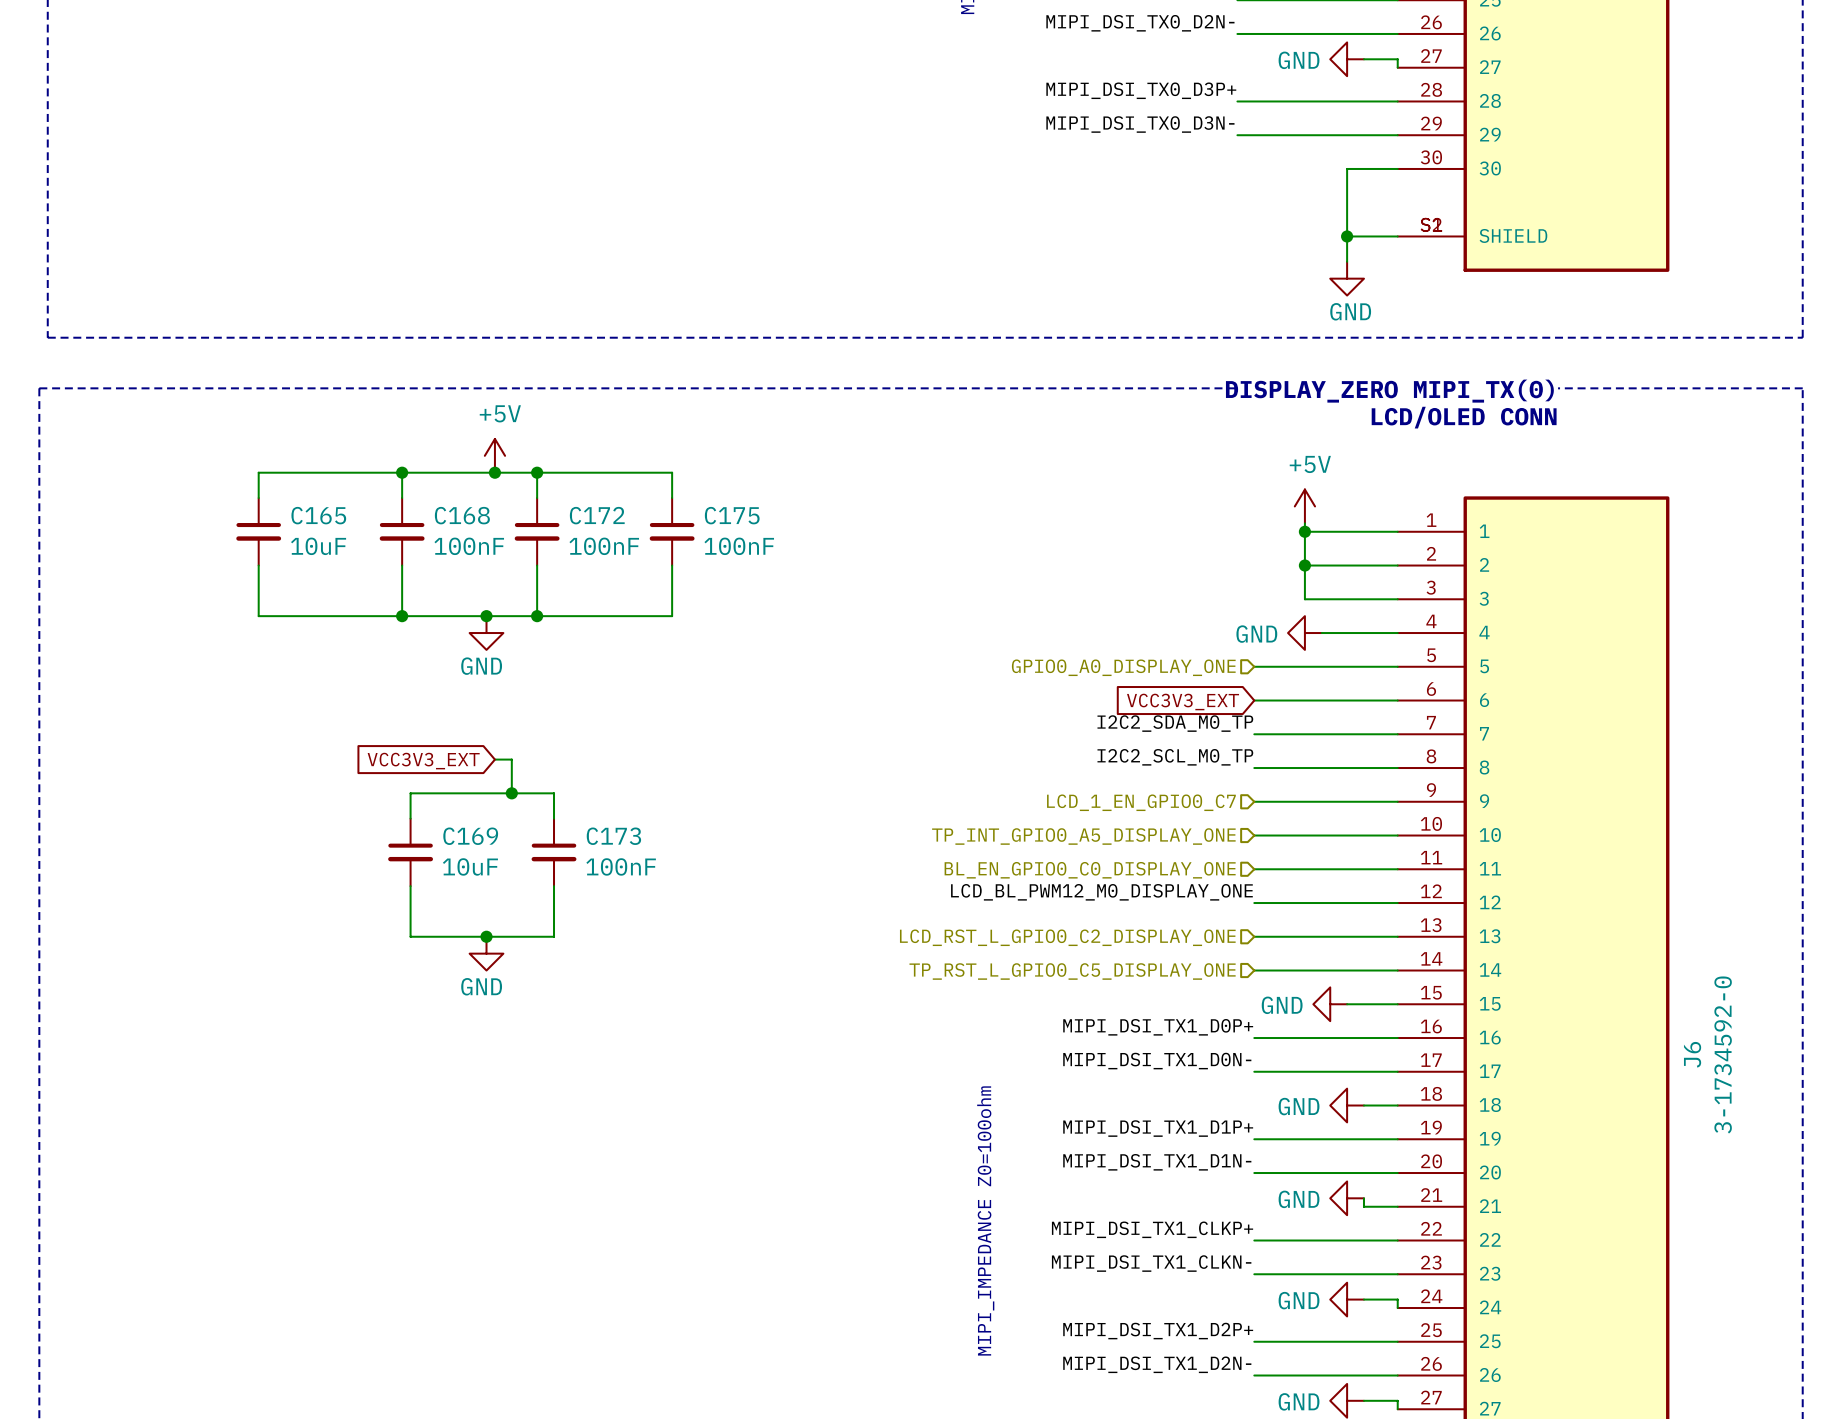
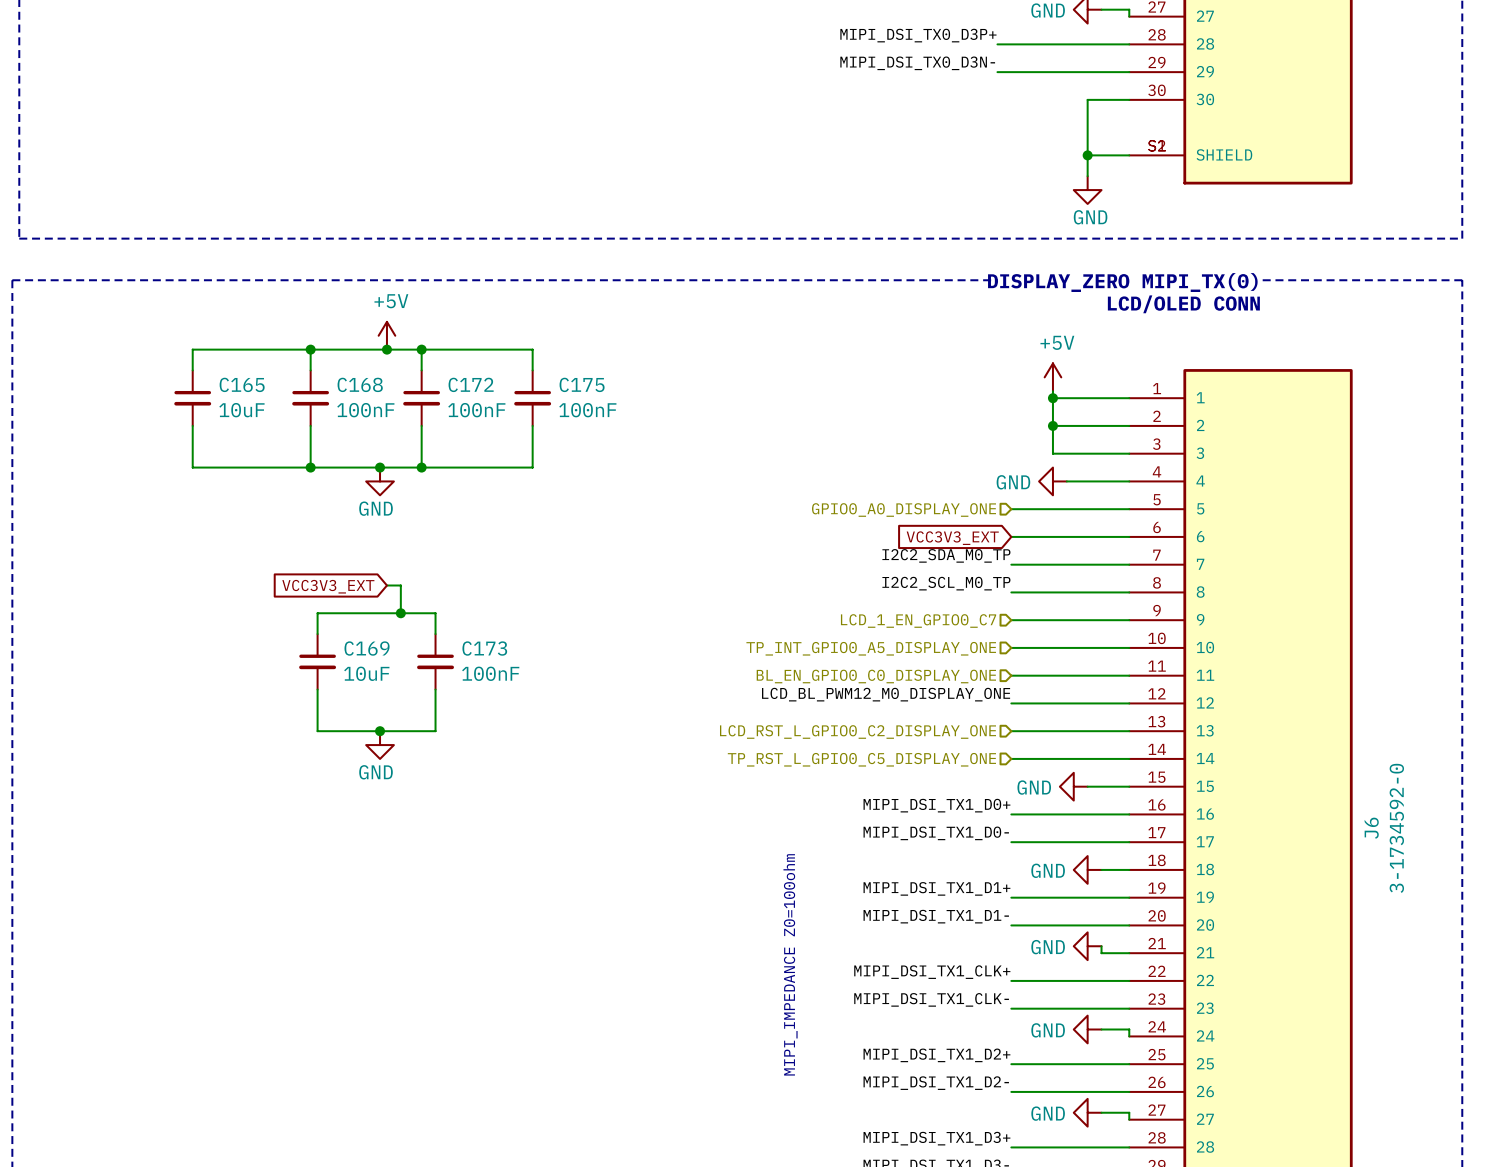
label: MIPI_DSI_TX1_D0P+ (1158, 1027) -> MIPI_DSI_TX1_D0+ (936, 805)
label: MIPI_DSI_TX1_D0N- (1157, 1061) -> MIPI_DSI_TX1_D0- (936, 833)
label: MIPI_DSI_TX1_D1P+ (1158, 1128) -> MIPI_DSI_TX1_D1+ (936, 888)
label: MIPI_DSI_TX1_D1N- (1157, 1162) -> MIPI_DSI_TX1_D1- (936, 916)
label: MIPI_DSI_TX1_CLKP+ (1152, 1229) -> MIPI_DSI_TX1_CLK+ (932, 972)
label: MIPI_DSI_TX1_CLKN- (1151, 1263) -> MIPI_DSI_TX1_CLK- (931, 999)
label: MIPI_DSI_TX1_D2P+ (1158, 1331) -> MIPI_DSI_TX1_D2+ (936, 1055)
label: MIPI_DSI_TX1_D2N- (1157, 1364) -> MIPI_DSI_TX1_D2- (936, 1083)

